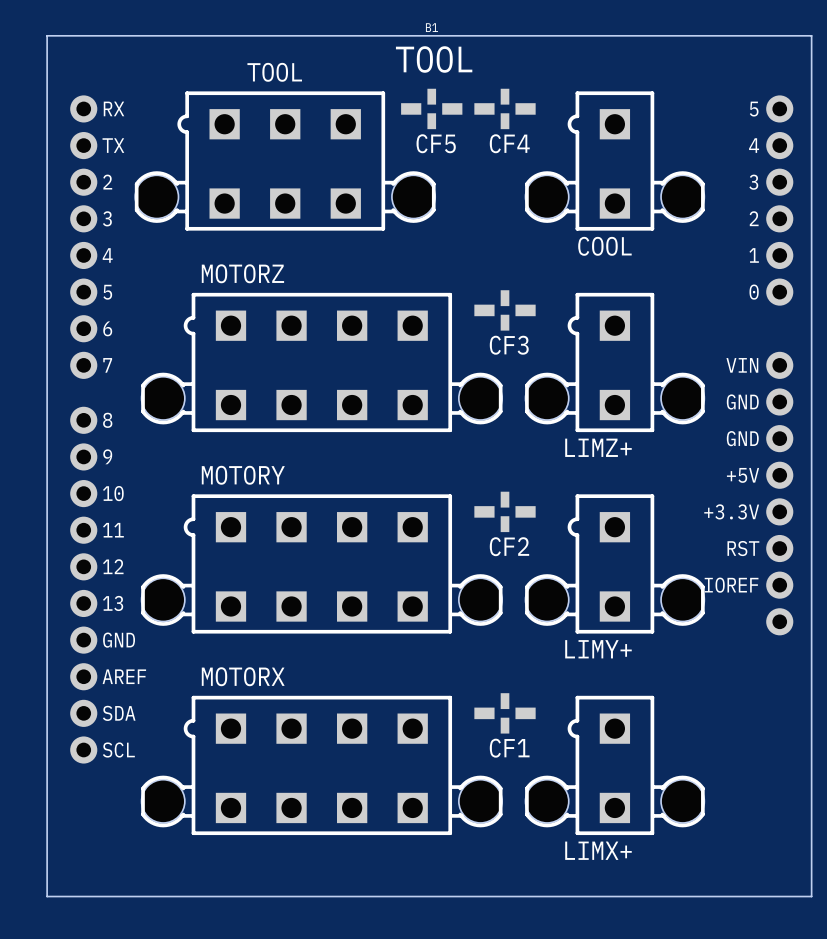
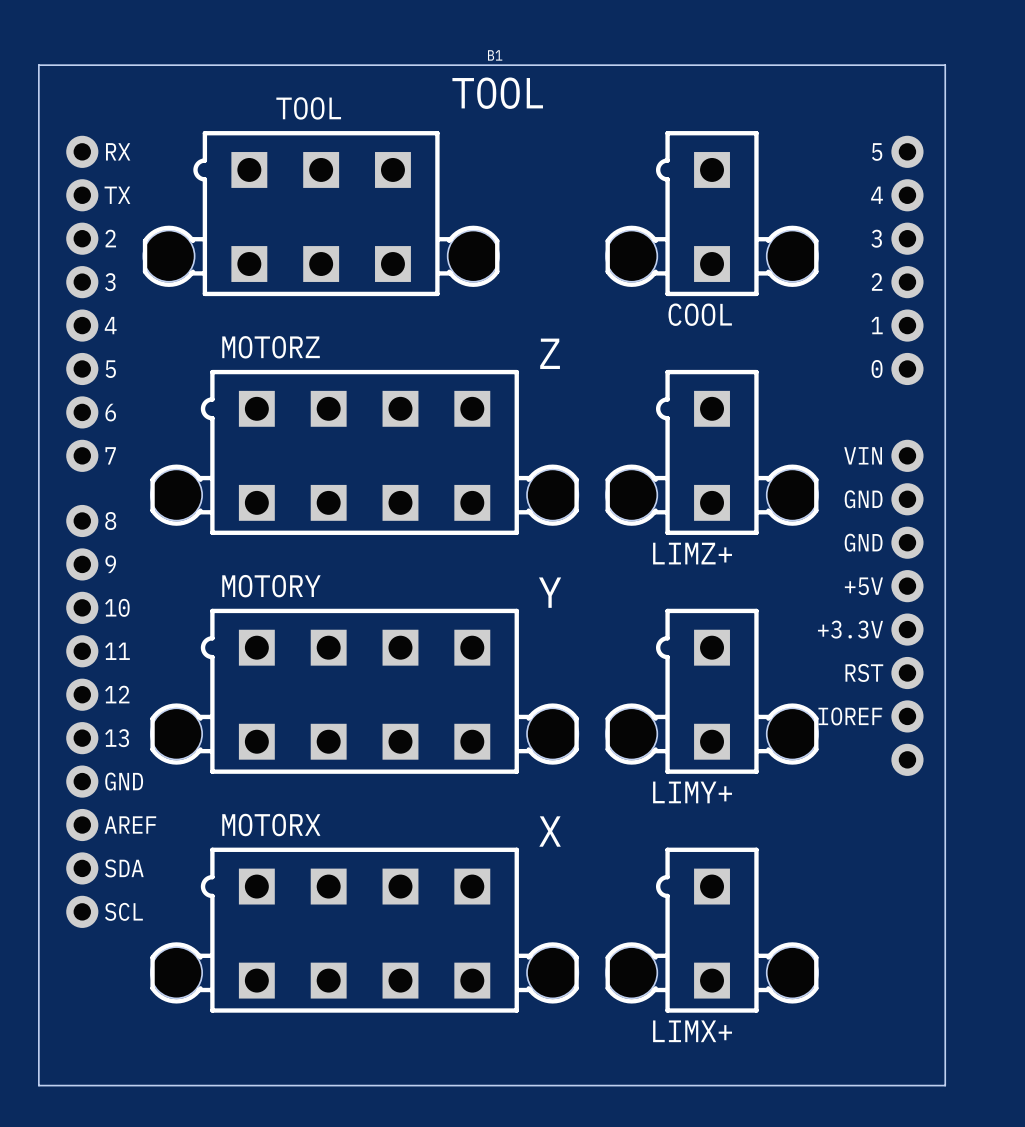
CF5: (431, 108) -> none
CF4: (505, 108) -> none
text: none -> Z (550, 353)
CF3: (505, 310) -> none
text: none -> Y (550, 592)
CF2: (505, 511) -> none
text: none -> X (550, 831)
CF1: (505, 713) -> none

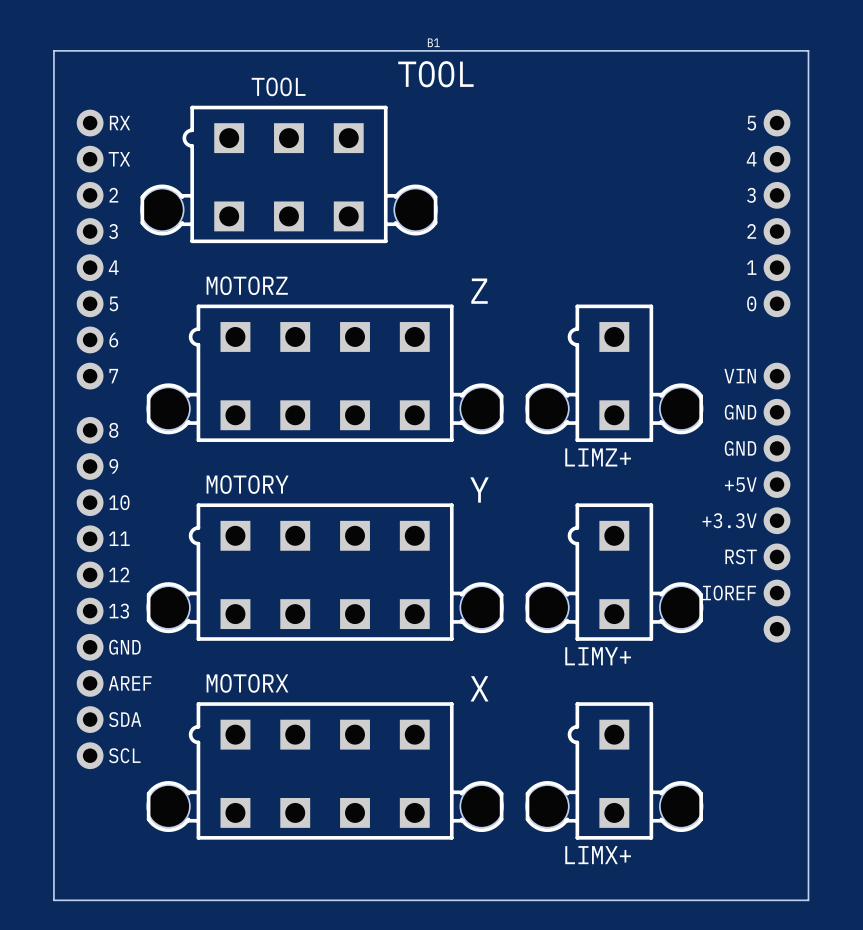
COOL: (712, 213) -> none

